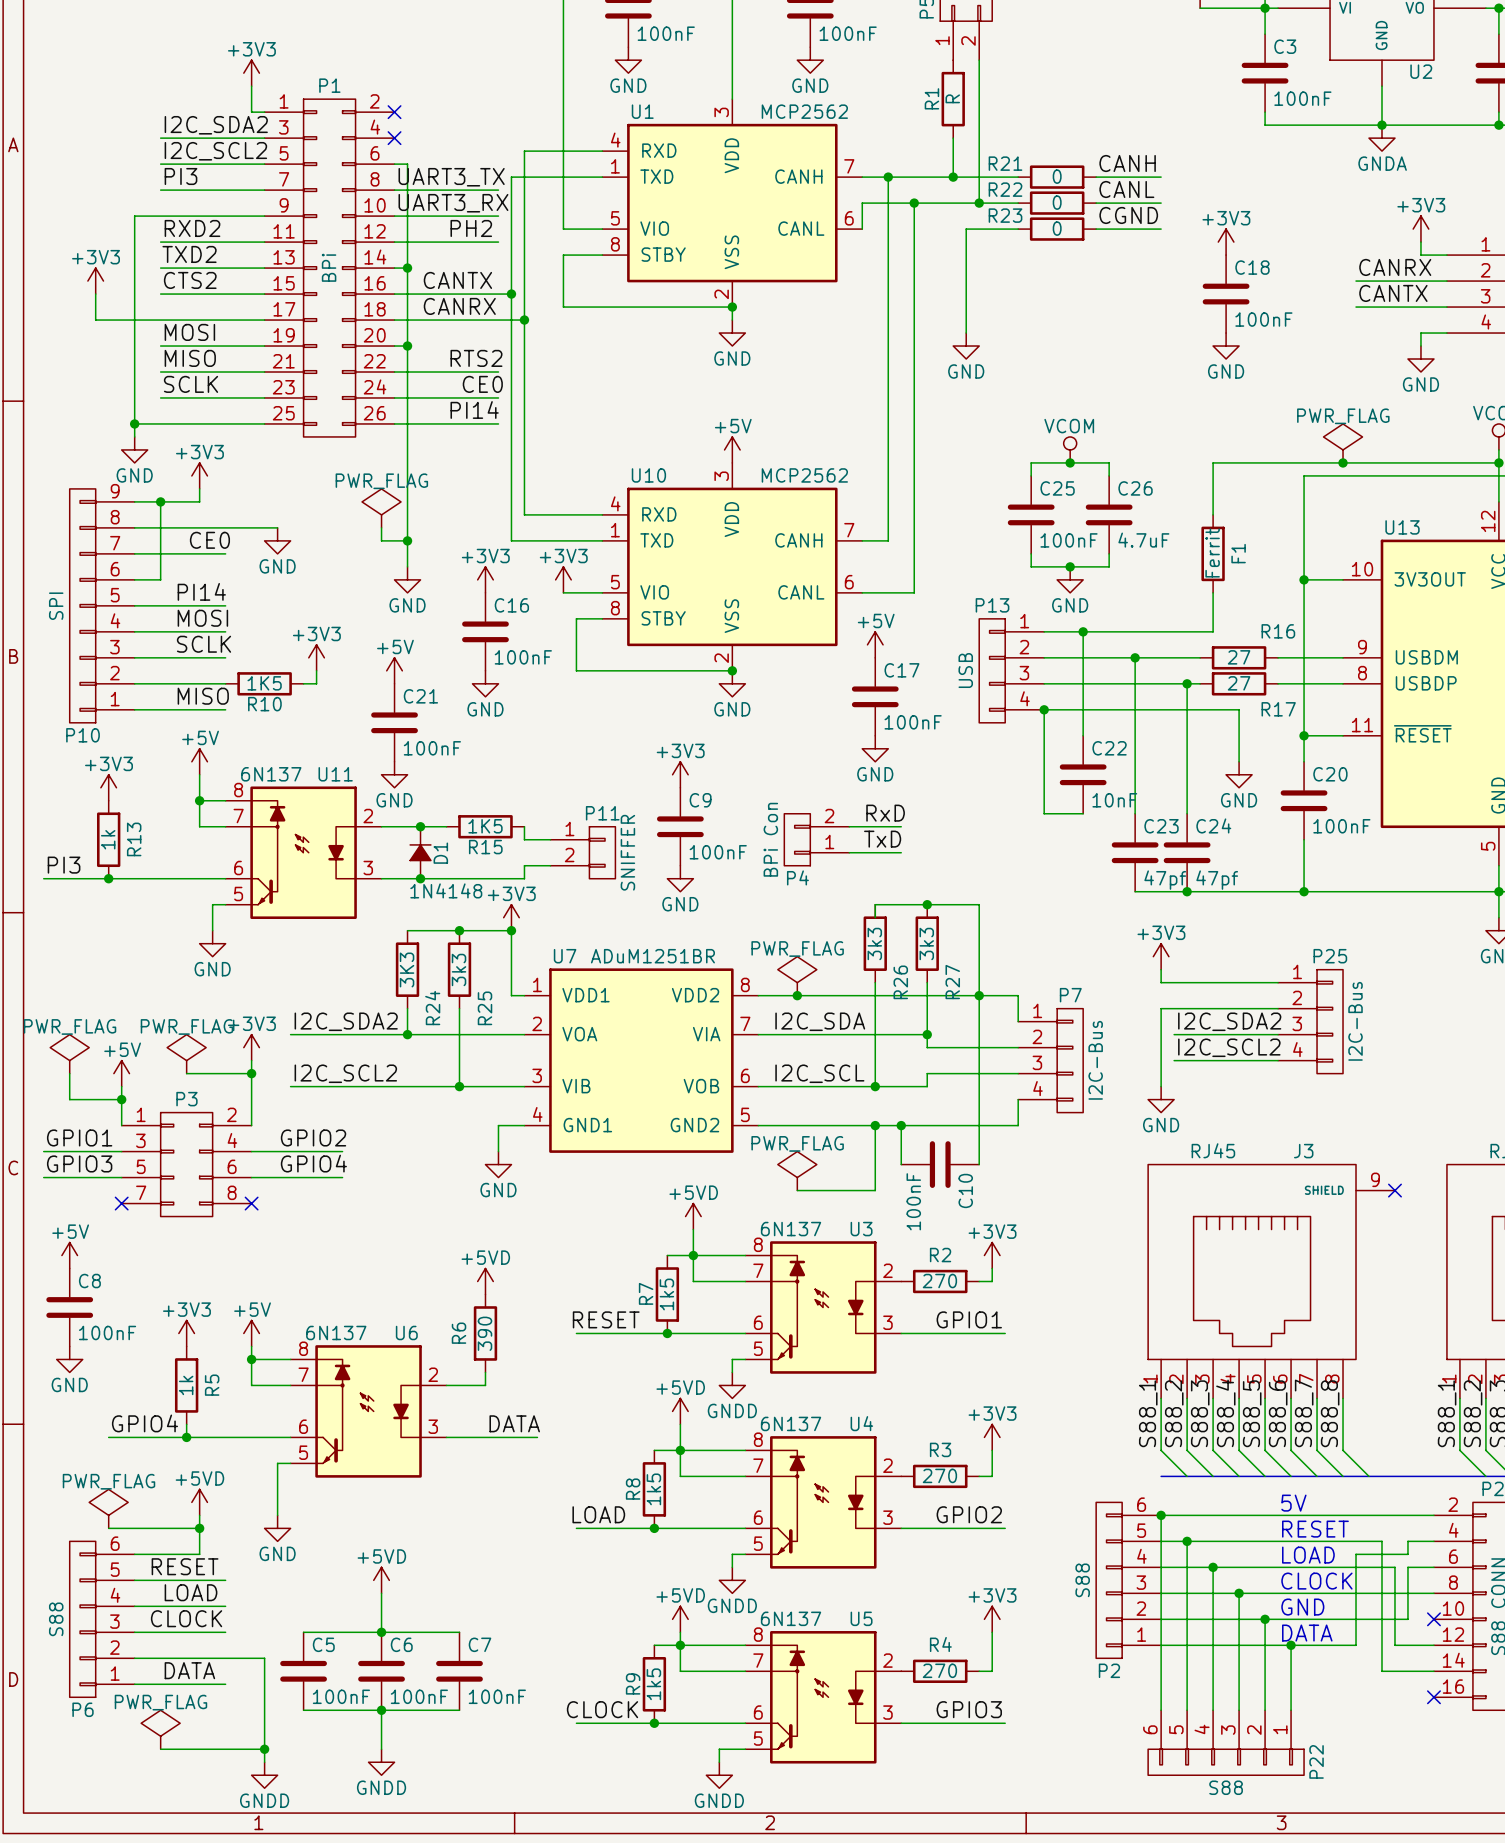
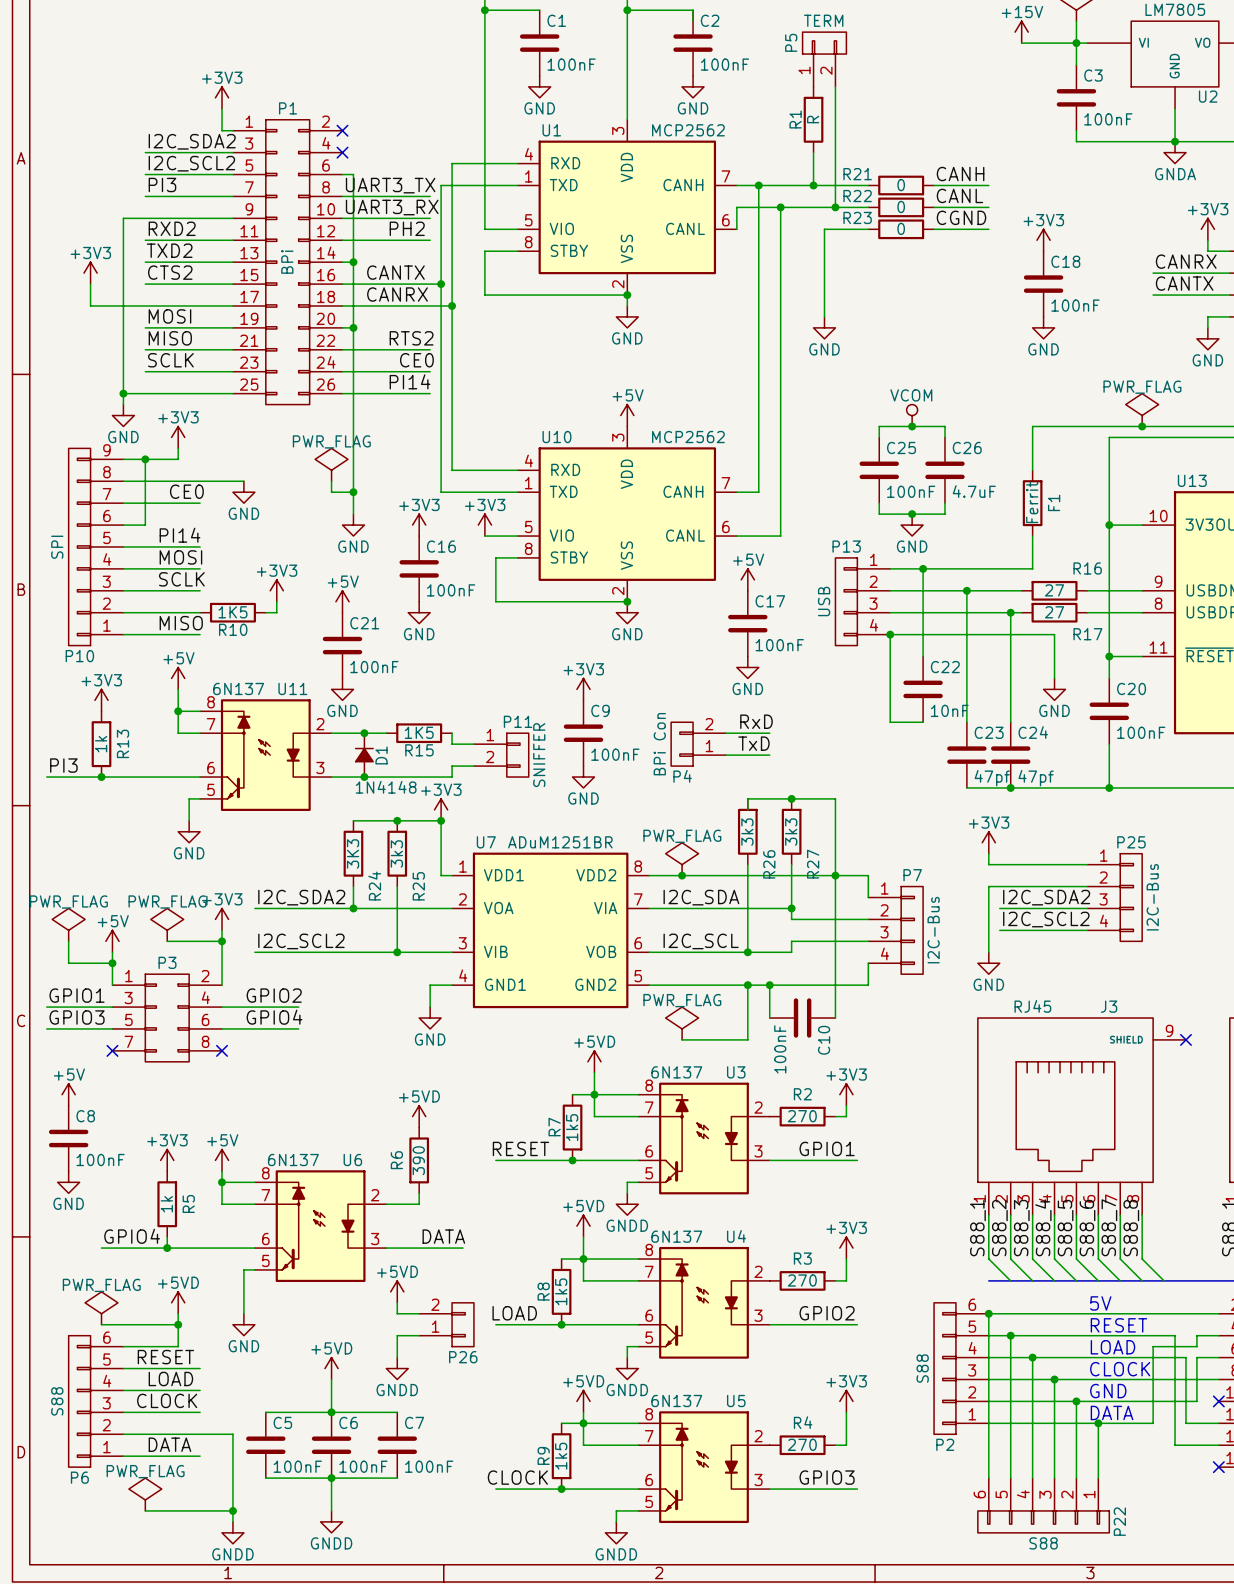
power symbol: none -> +5VD (397, 1291)
wire: none -> (397, 1302) (397, 1313) (419, 1313)
P26: none -> (446, 1324)
wire: none -> (419, 1335) (397, 1335) (397, 1357)
power symbol: none -> GNDD (397, 1368)

